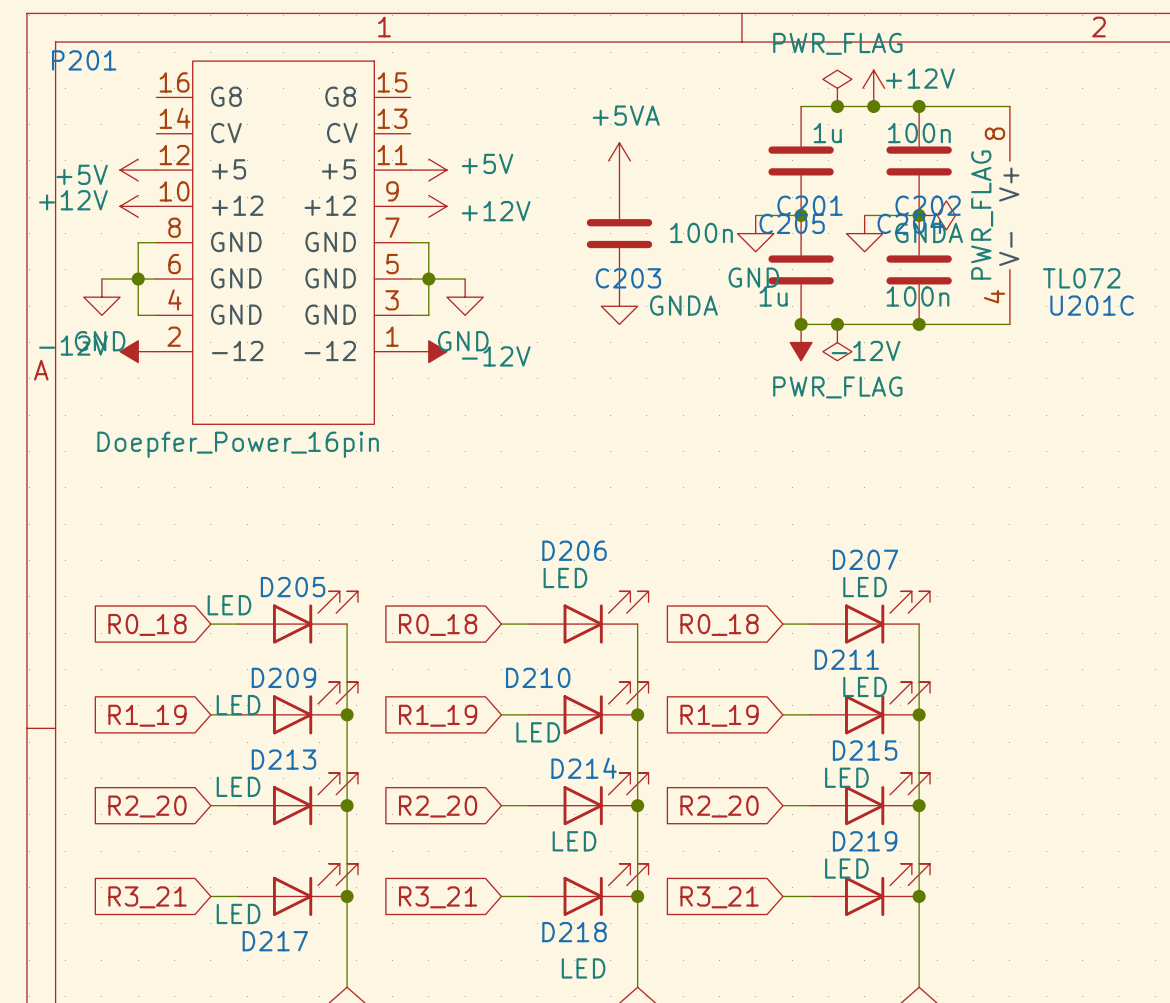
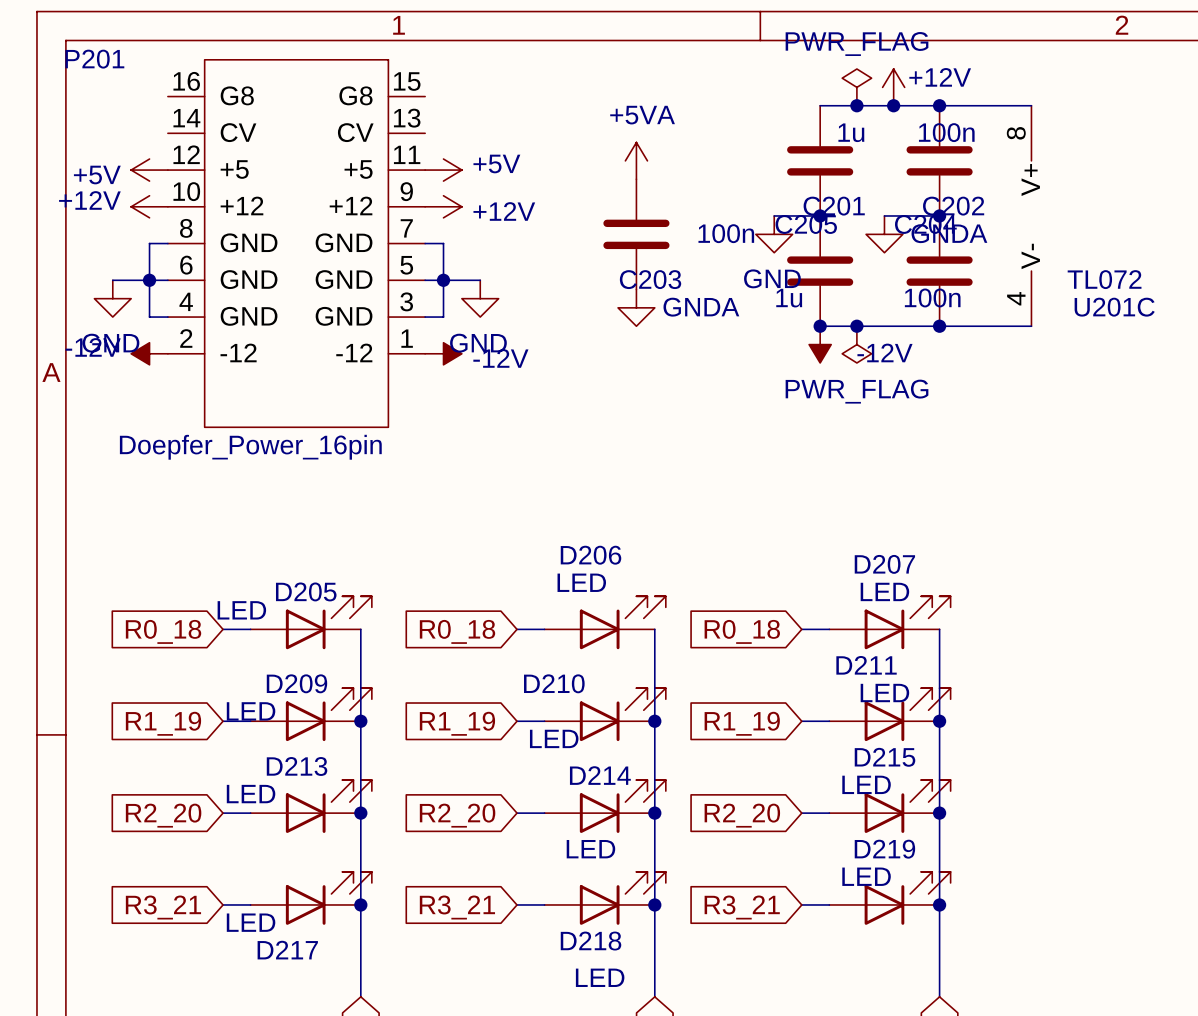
power symbol: PWR_FLAG (937, 215) -> none

